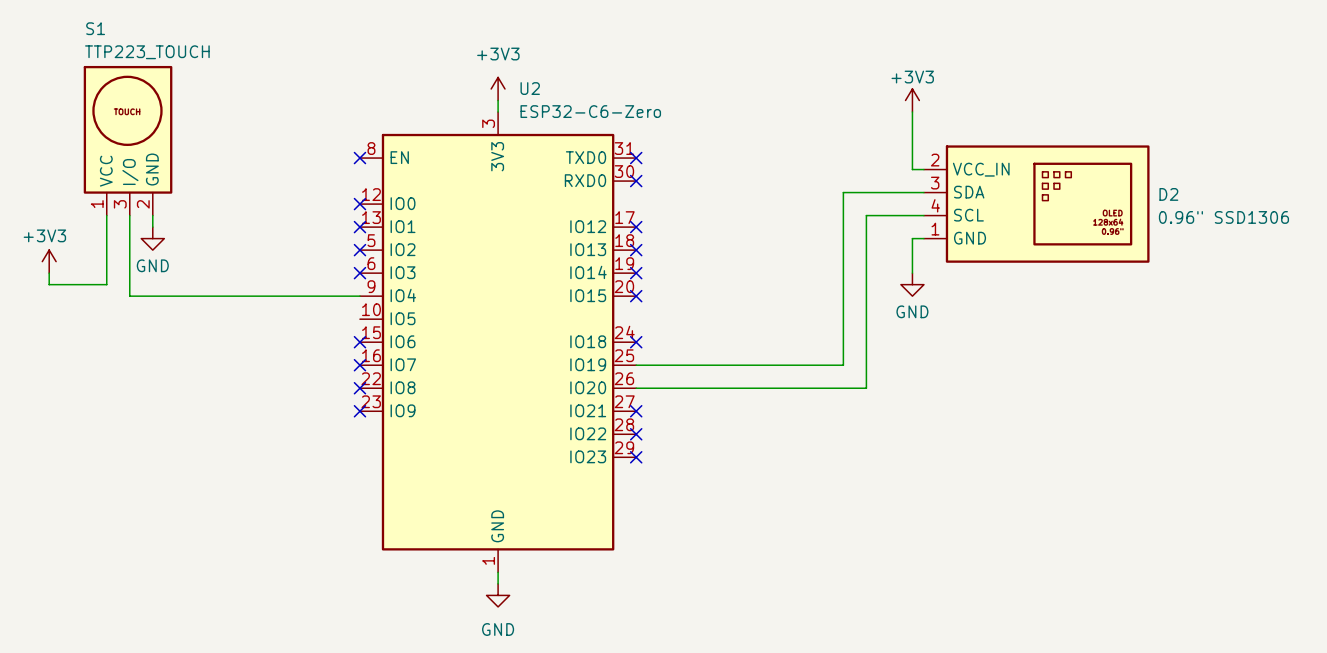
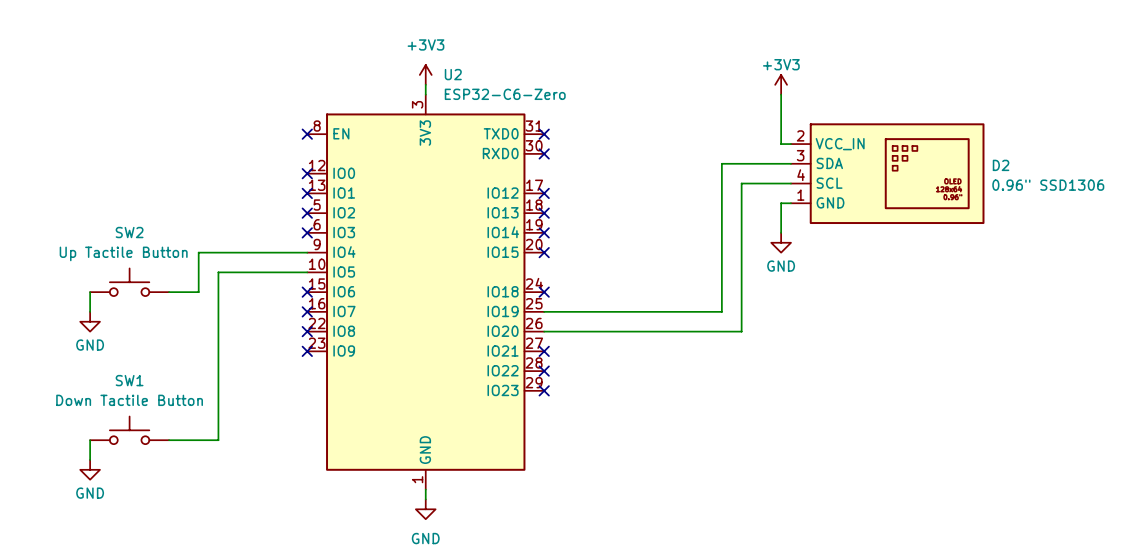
S1: TTP223_TOUCH (128, 140) -> none
wire: (106, 215) (106, 284) (49, 284) (49, 273) -> none
wire: (129, 215) (129, 296) (233, 296) -> (169, 292) (198, 292) (198, 252)
wire: (152, 215) (152, 227) -> none
power symbol position: GND (152, 238) -> GND (90, 321)
power symbol: +3V3 (49, 261) -> none
wire: none -> (307, 272) (218, 272) (218, 440) (169, 440)
SW2: none -> Up Tactile Button (129, 282)
wire: none -> (90, 292) (90, 311)
SW1: none -> Down Tactile Button (129, 430)
wire: none -> (90, 440) (90, 459)
power symbol: none -> GND (90, 469)

